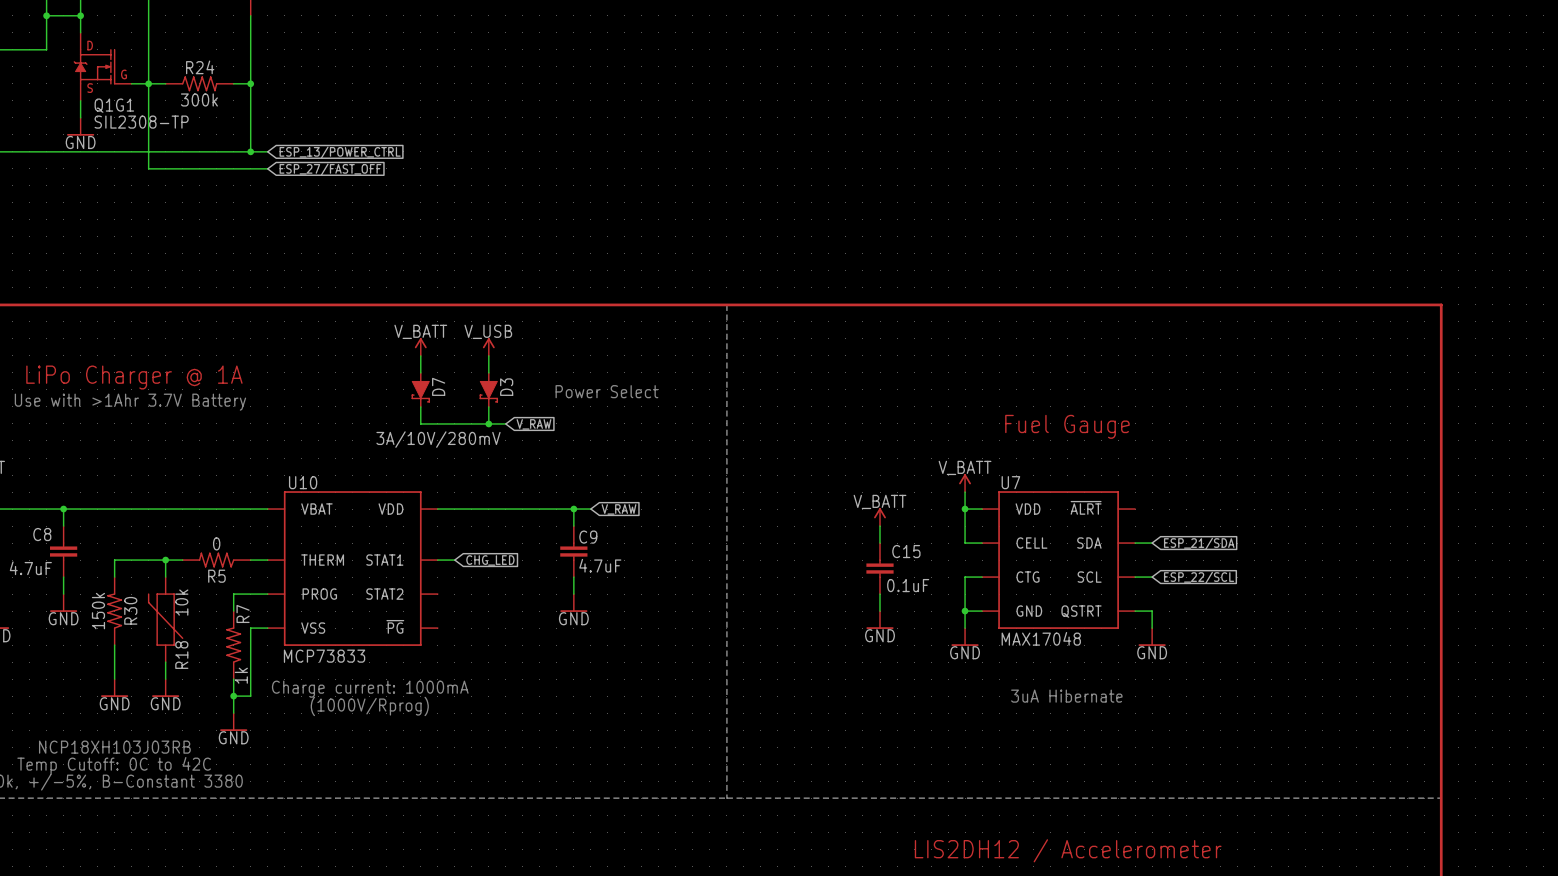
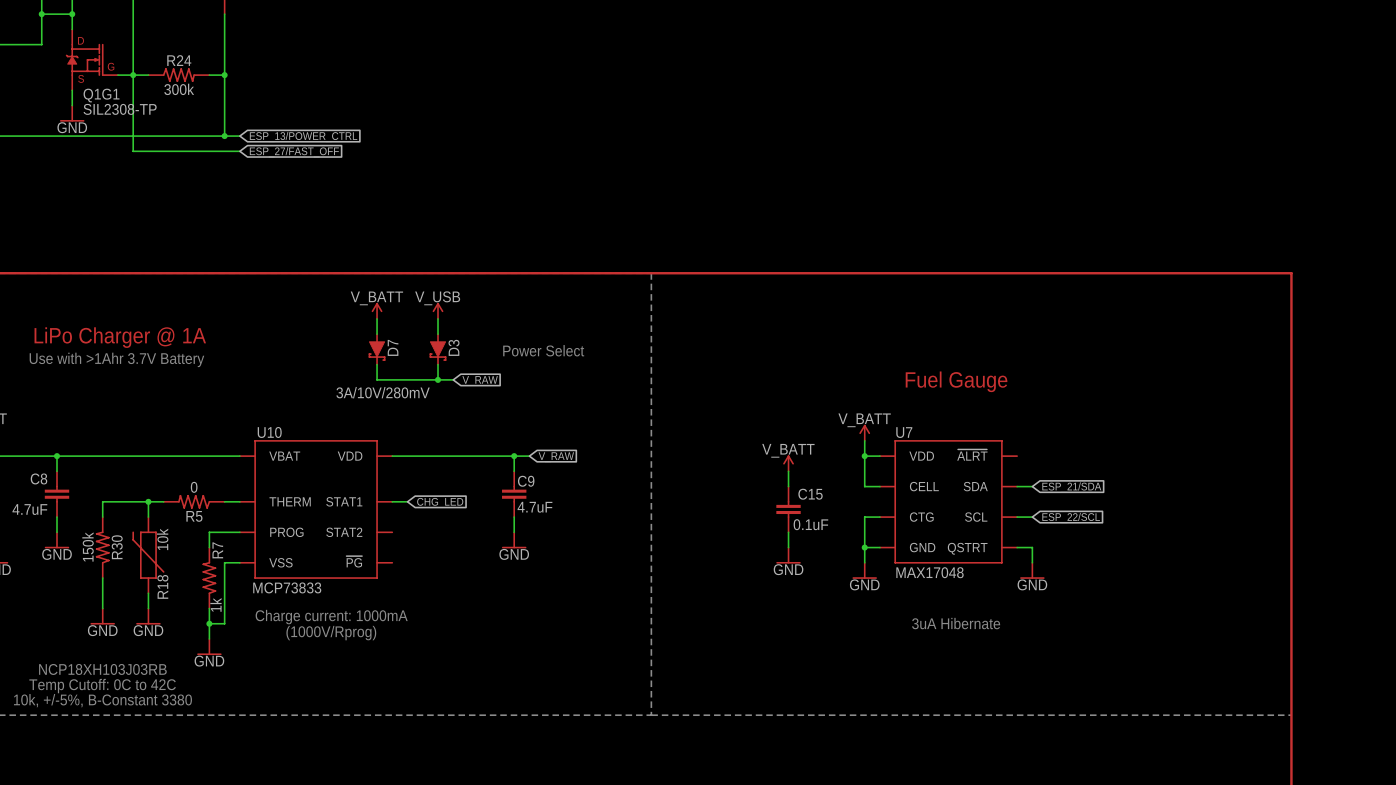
text: LIS2DH12 / Accelerometer (1068, 850) -> none

